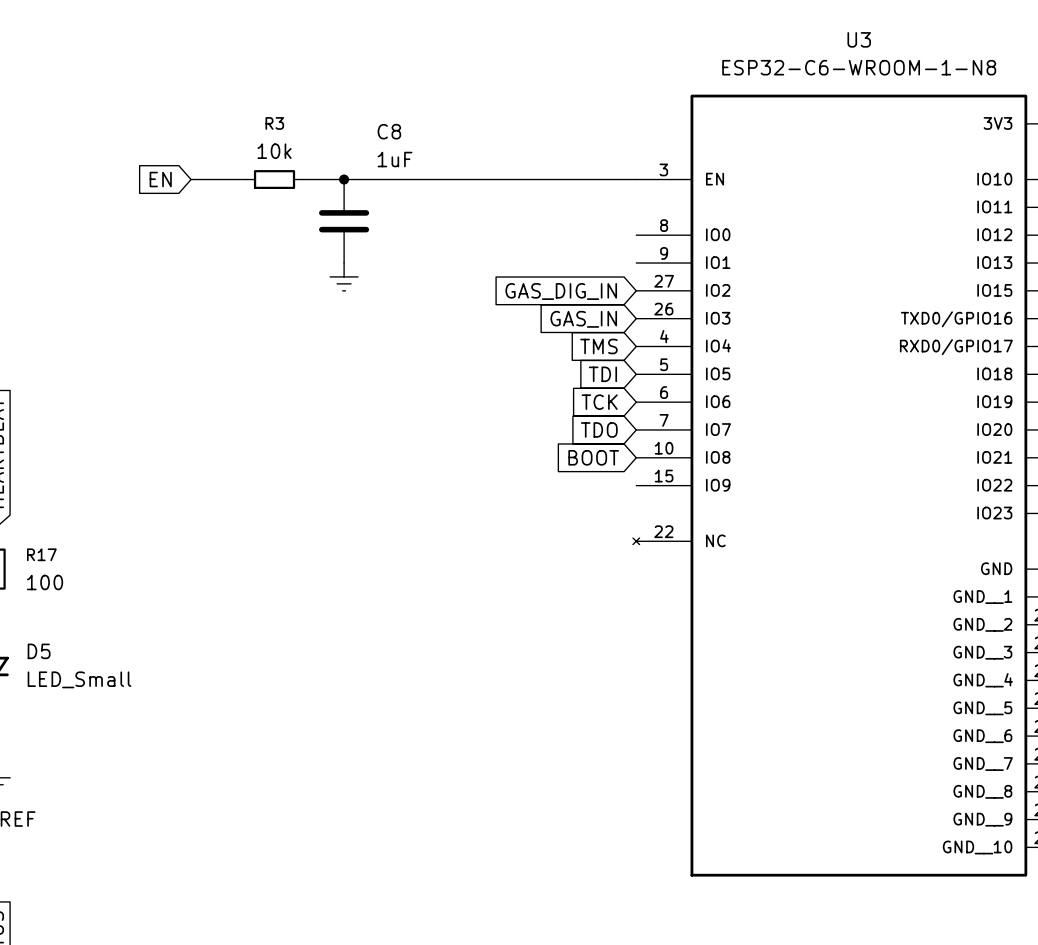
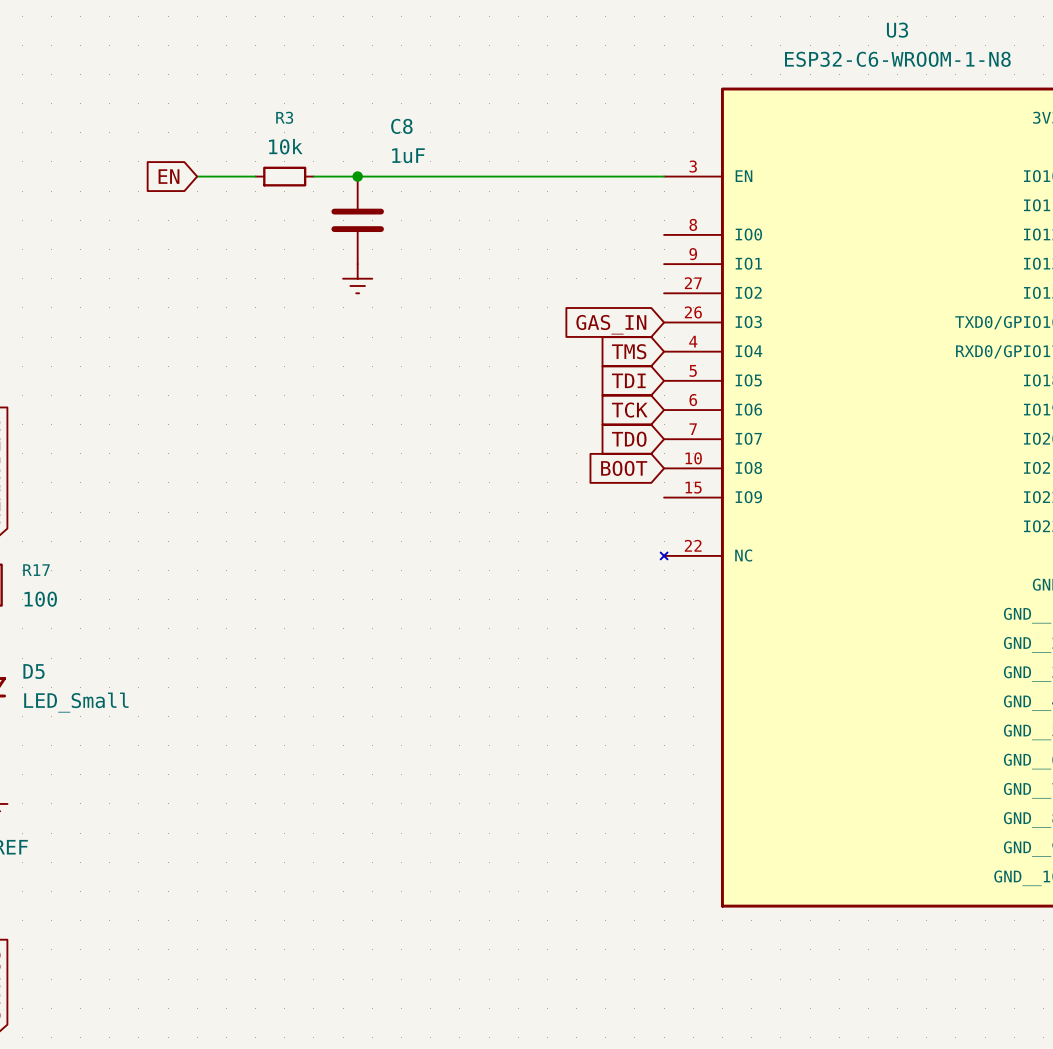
global label: GAS_DIG_IN (561, 291) -> none

